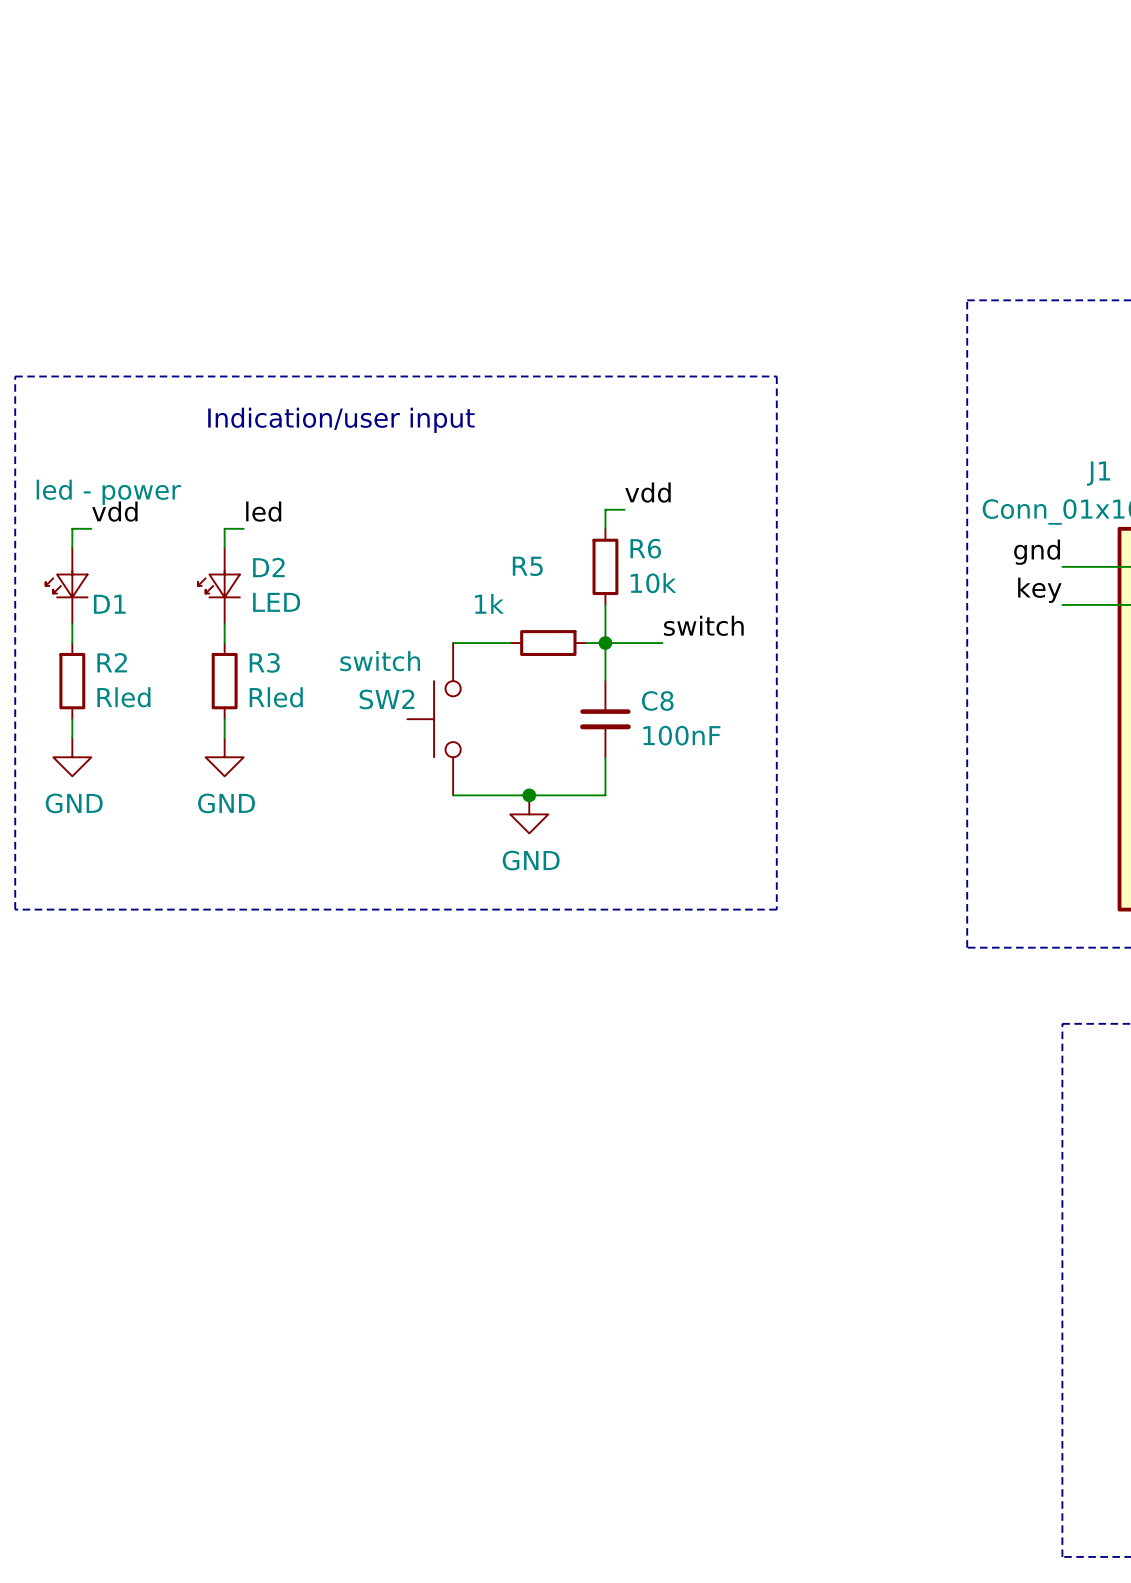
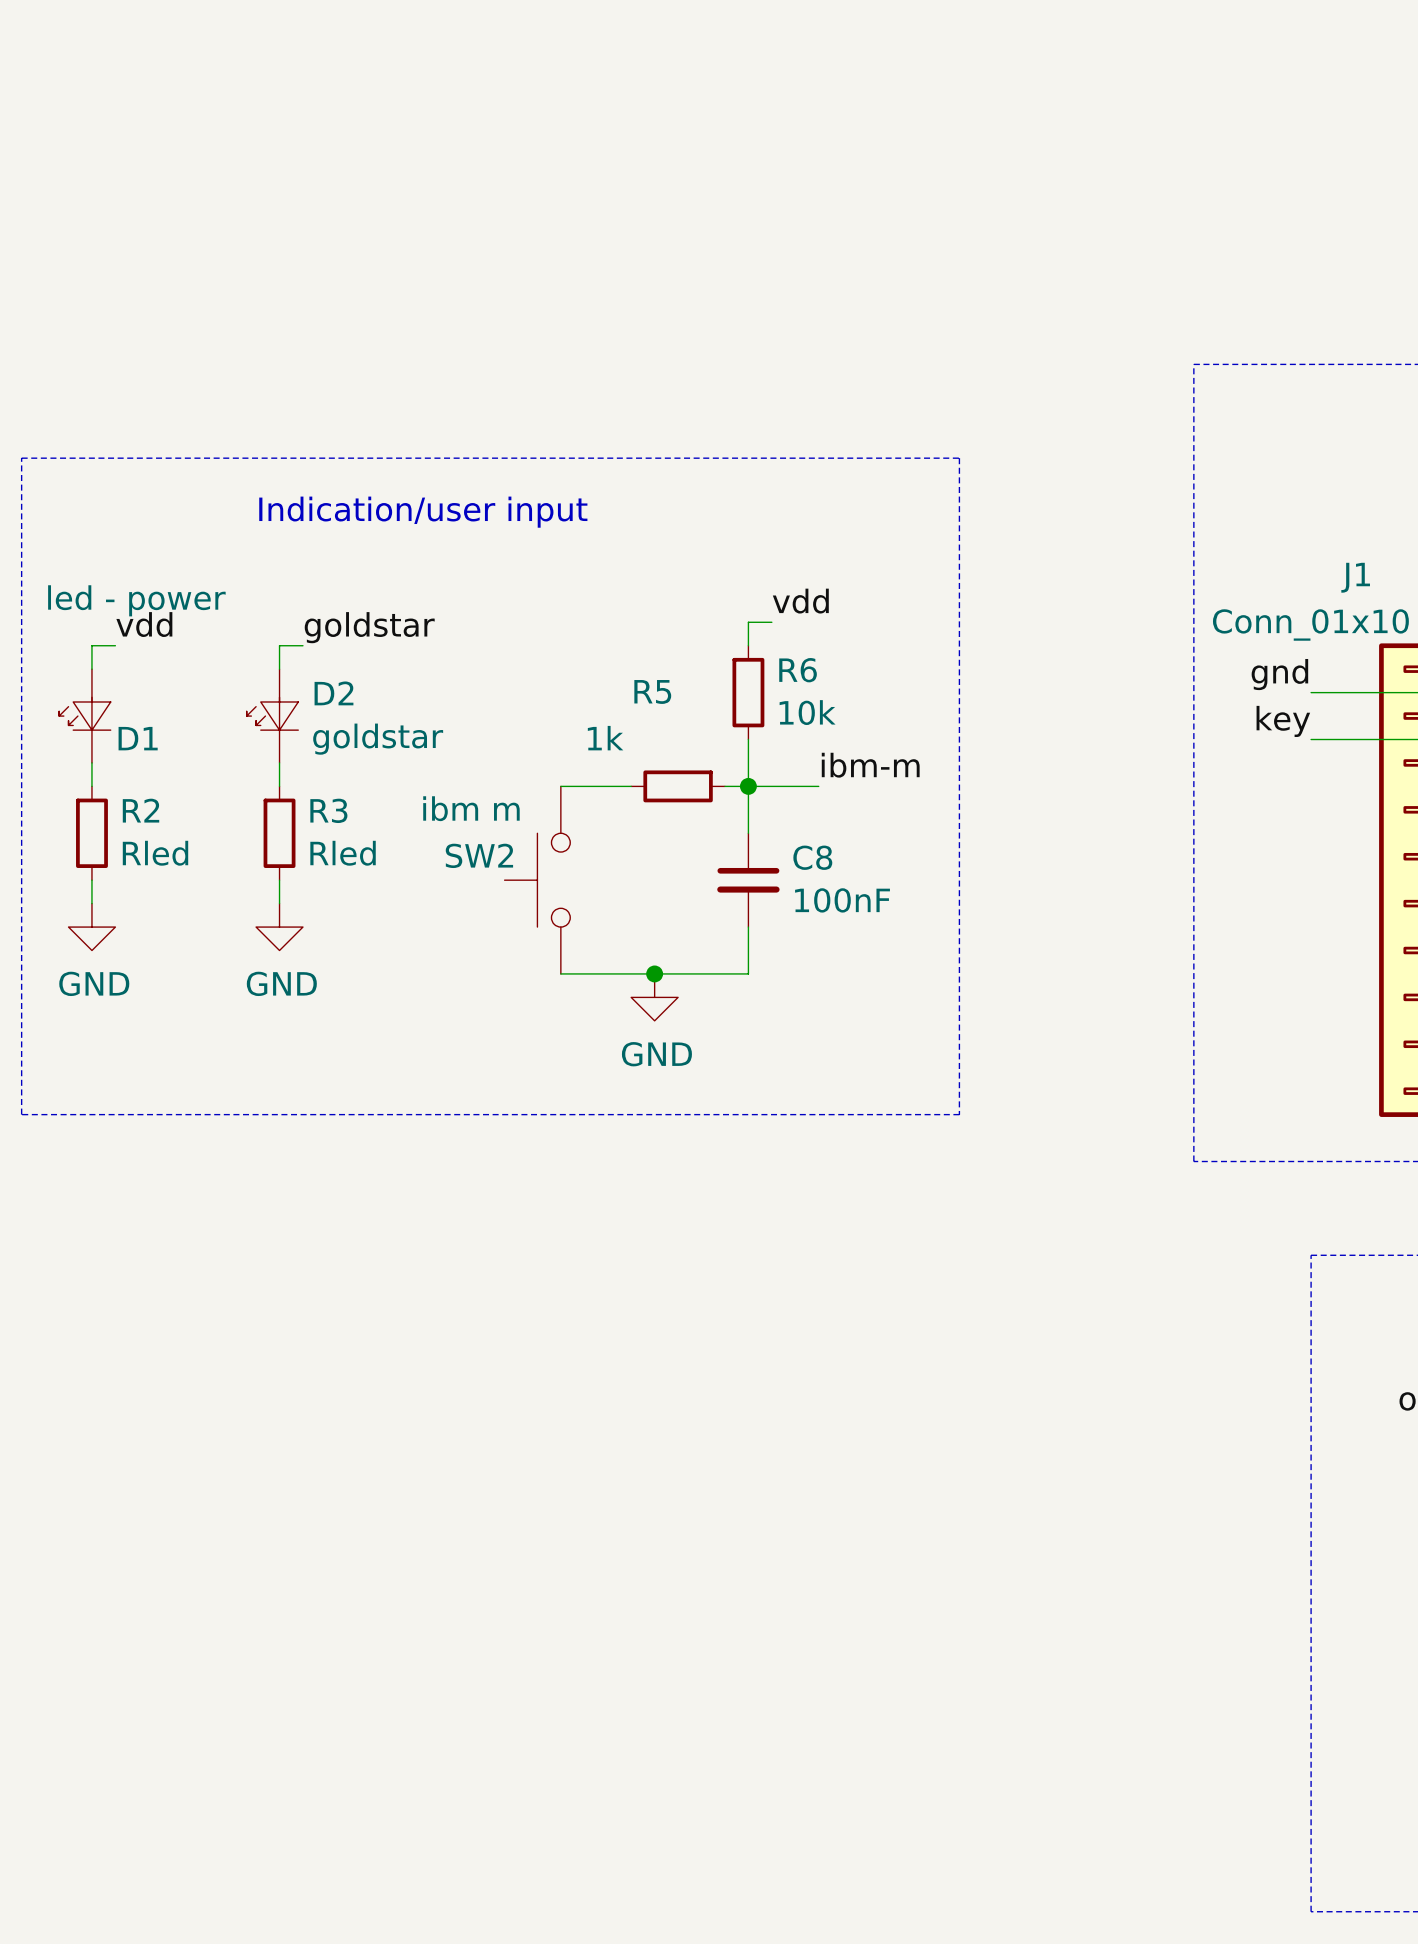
label: led (263, 511) -> goldstar (369, 627)
D2 value: LED (276, 602) -> goldstar (378, 739)
label: switch (703, 625) -> ibm-m (870, 765)
SW2 value: switch (380, 661) -> ibm m (471, 808)

